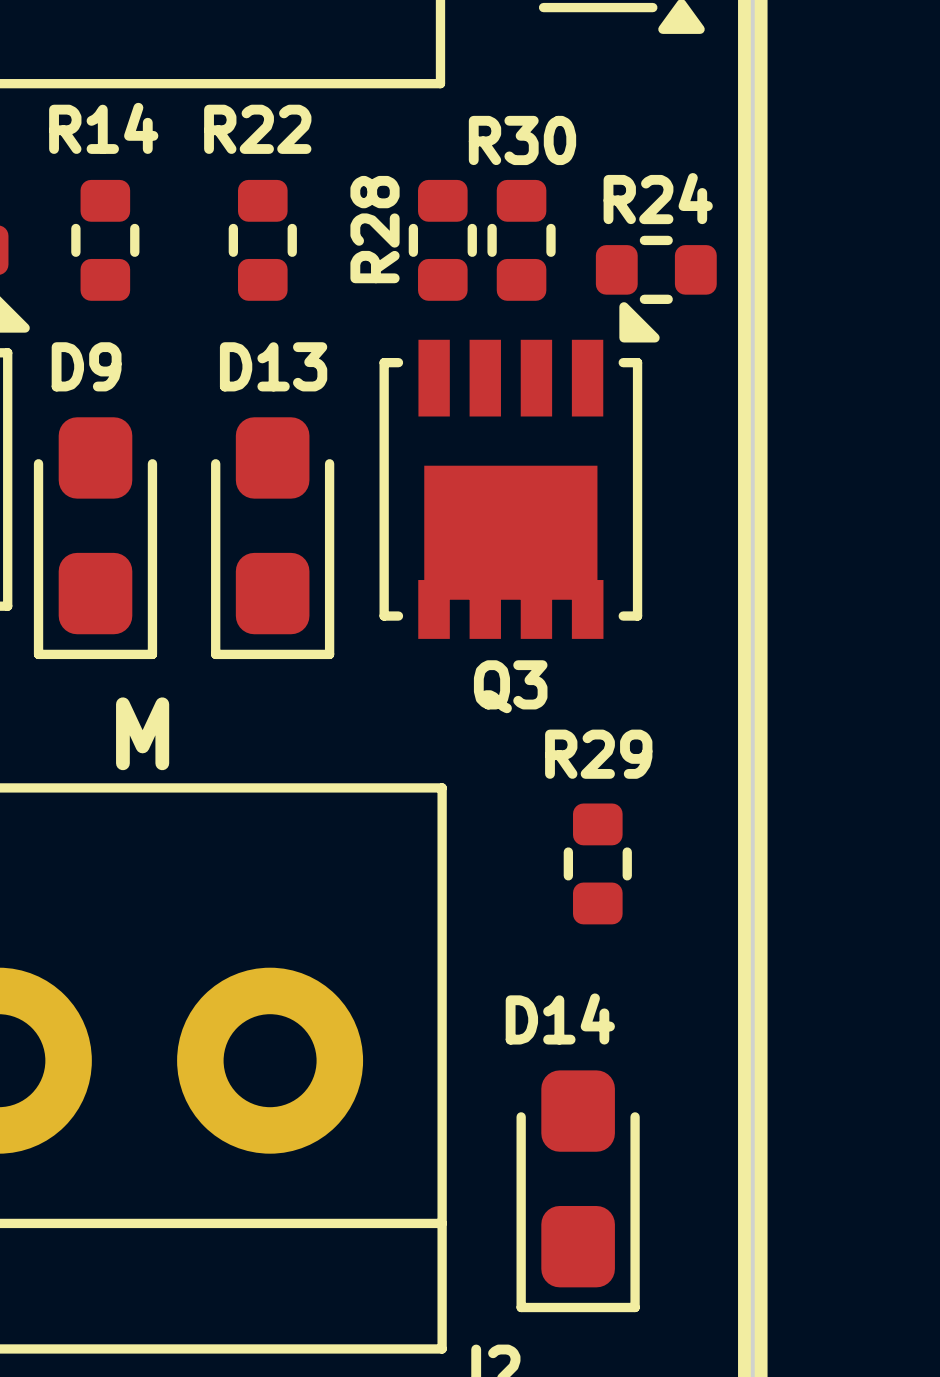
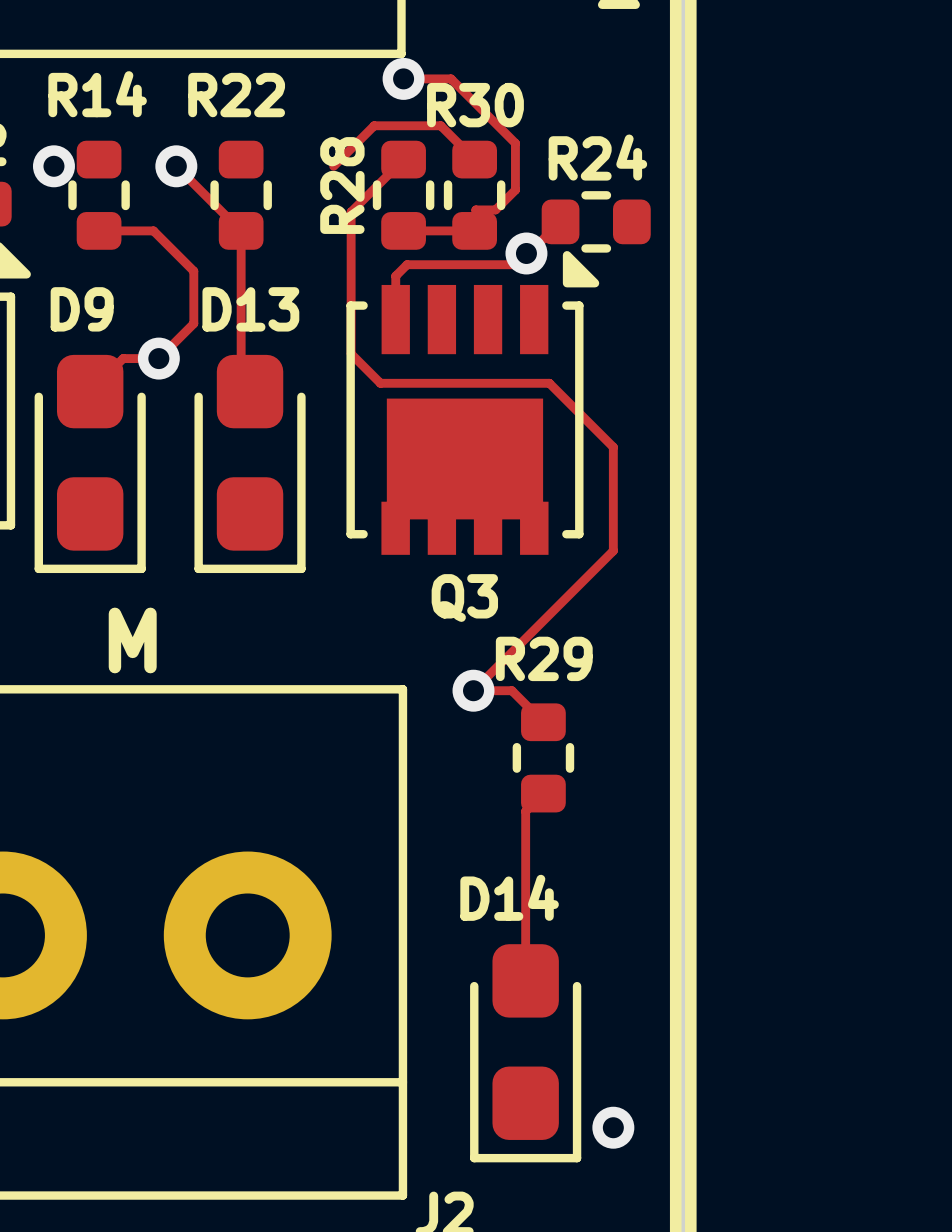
top track: none -> (403, 78) (451, 78) (515, 143) (515, 190) (495, 209) (475, 209) (474, 230) (403, 230)
via: none -> (403, 78)
top track: none -> (403, 159) (351, 212) (351, 353) (380, 383) (549, 383) (613, 447) (613, 550) (473, 690) (511, 690) (543, 722)
top track: none -> (474, 159) (440, 125) (374, 125) (333, 166)
via: none -> (53, 166)
top track: none -> (176, 166) (241, 231) (241, 382) (250, 391)
via: none -> (176, 166)
top track: none -> (560, 221) (528, 253) (526, 253) (526, 255) (517, 264) (407, 264) (395, 276) (395, 319)
top track: none -> (99, 230) (153, 230) (193, 271) (193, 323) (158, 358) (123, 358) (90, 391)
via: none -> (526, 253)
via: none -> (158, 358)
via: none -> (473, 690)
top track: none -> (543, 793) (525, 811) (525, 980)
via: none -> (613, 1127)

